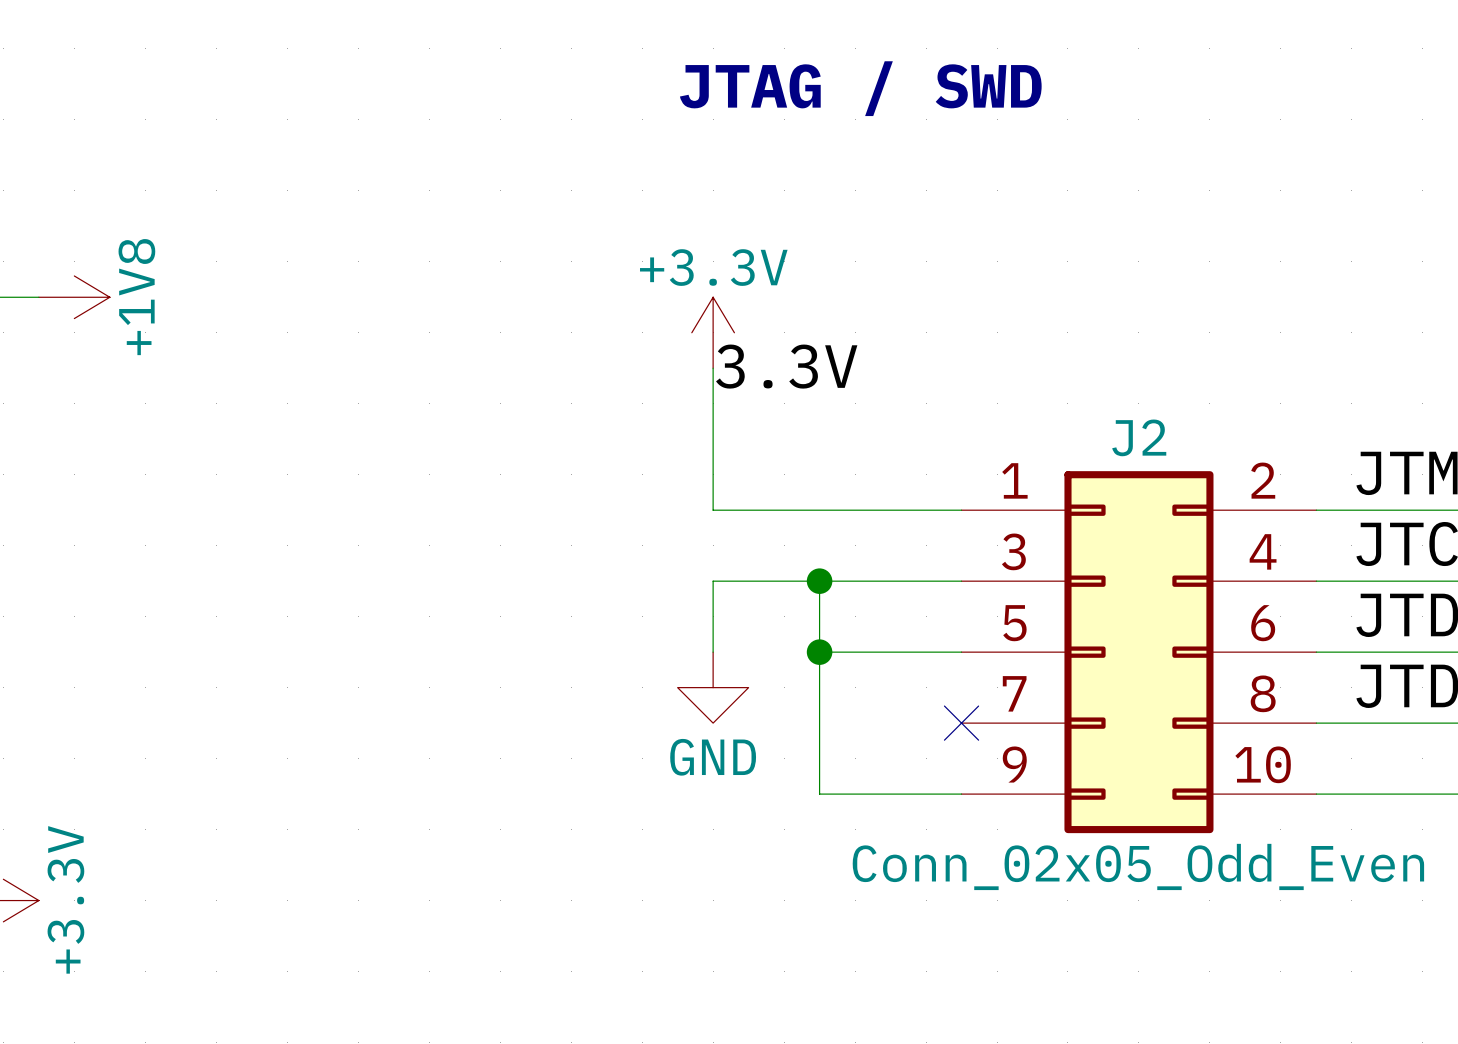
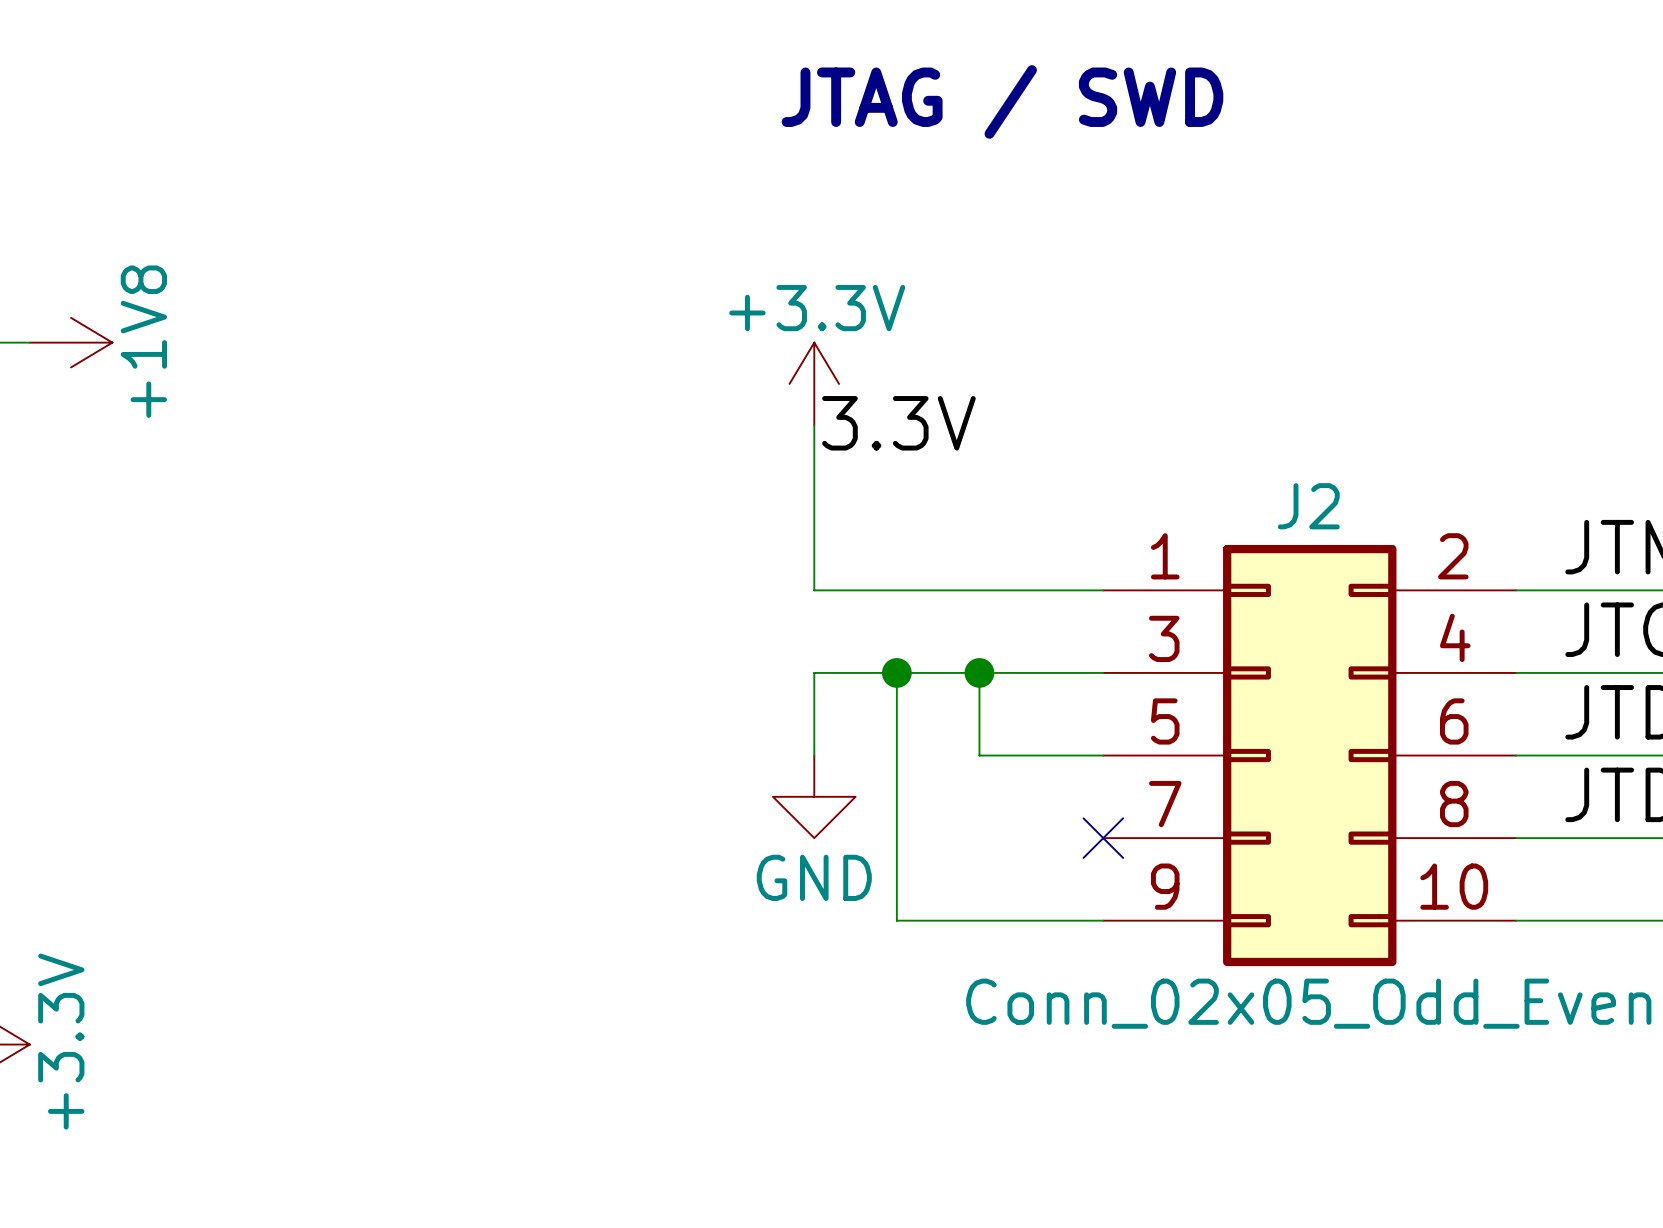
junction: none -> (896, 672)
wire: (819, 581) (819, 794) -> (896, 672) (896, 920) (938, 920)
junction: (819, 581) -> none
junction: none -> (979, 672)
wire: (819, 652) (855, 652) -> (979, 672) (979, 755)
junction: (819, 652) -> none

